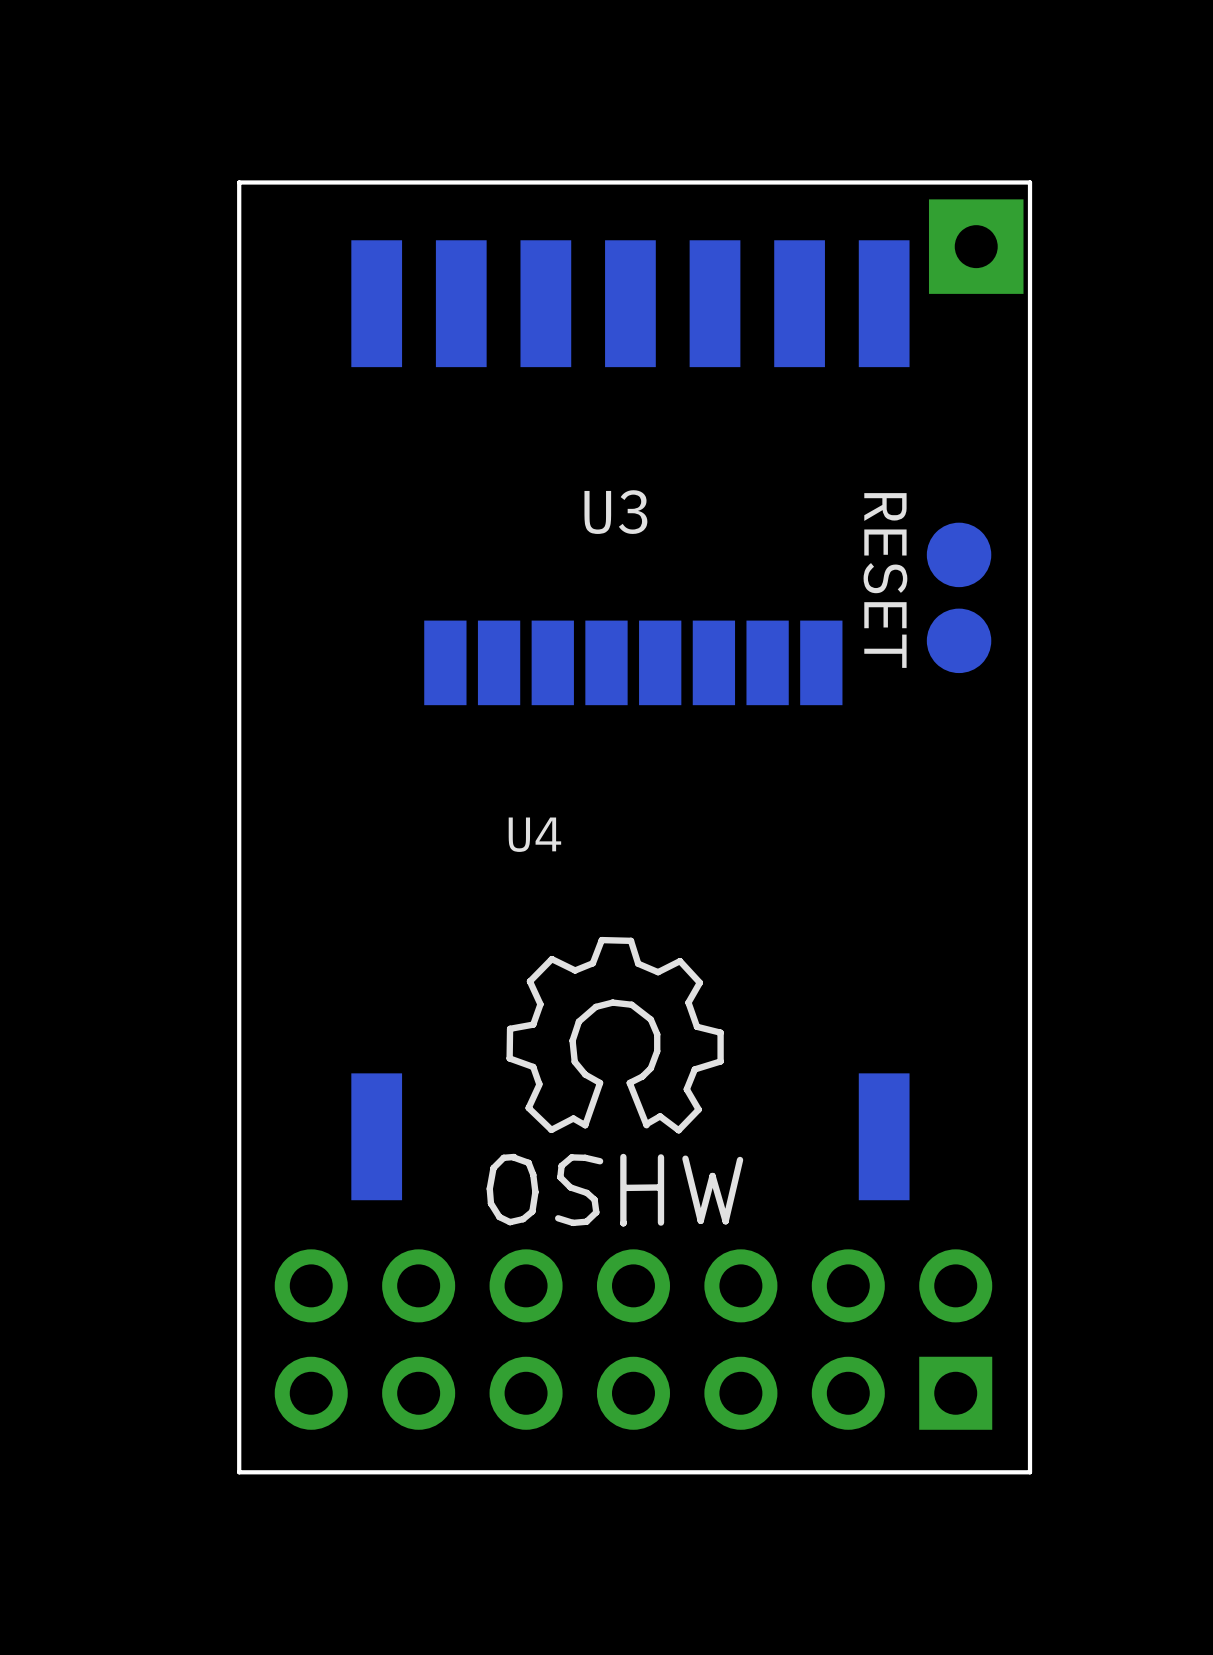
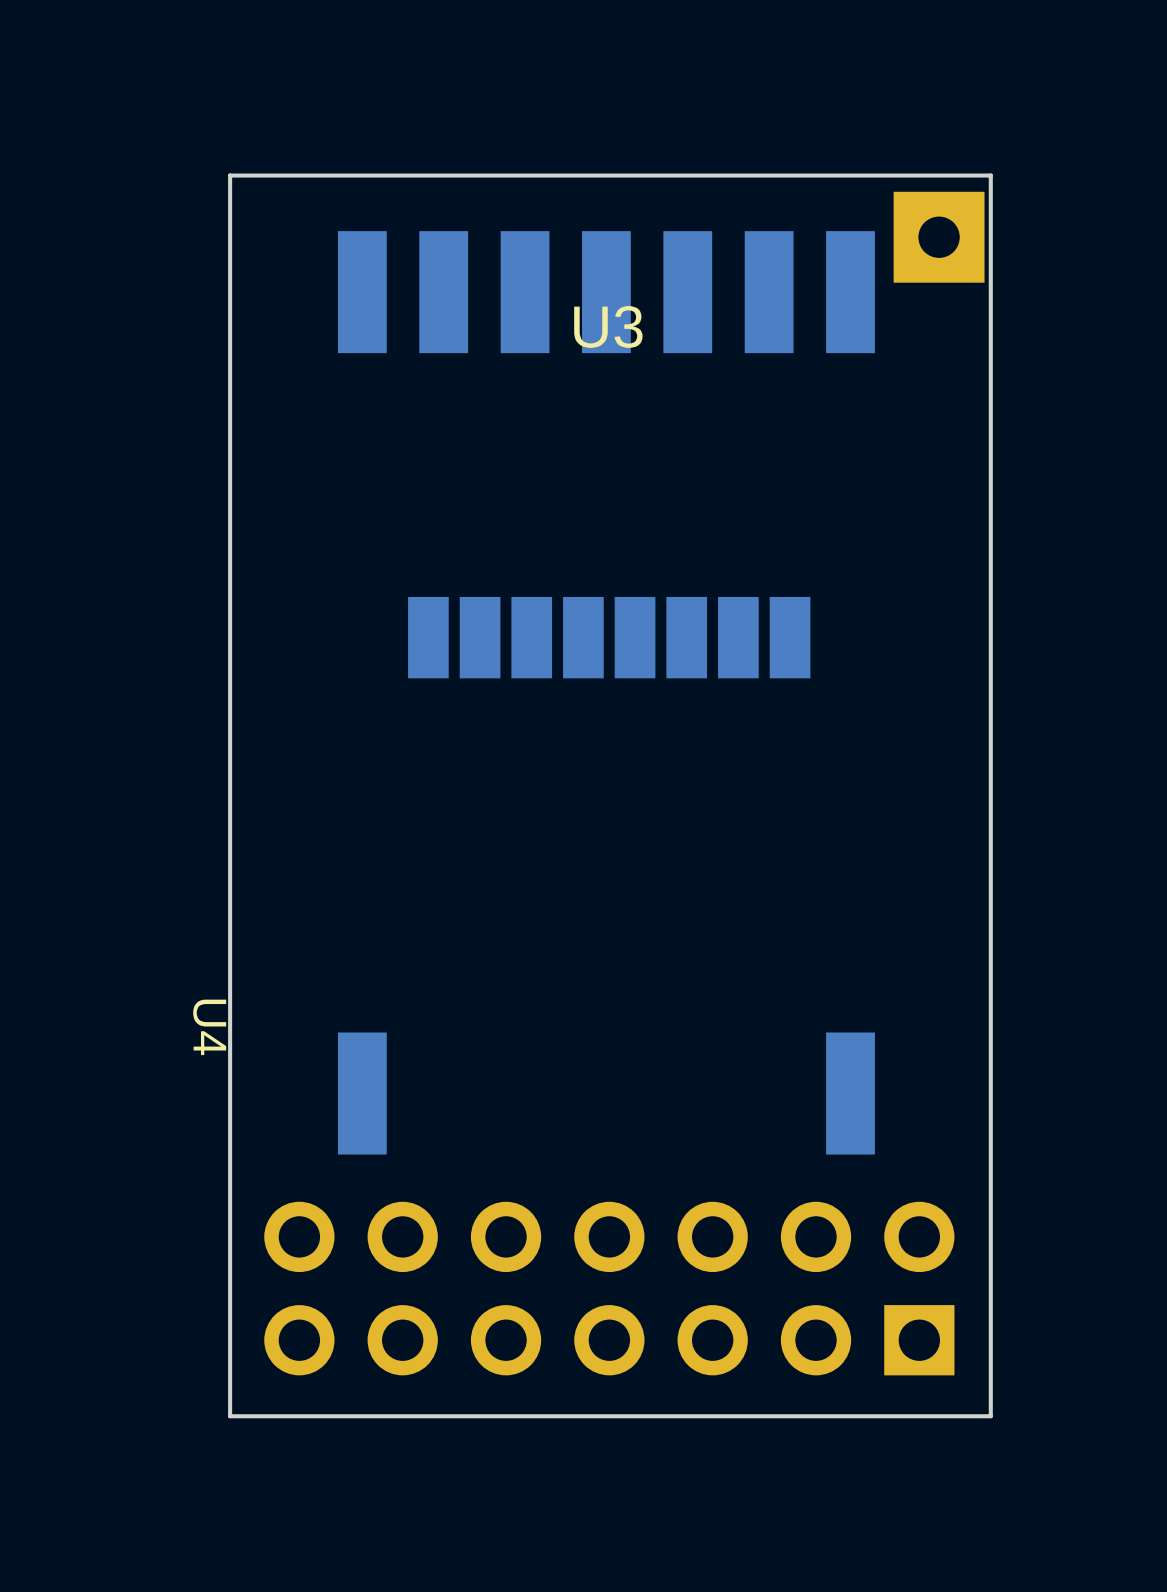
U3 name position: U3 (615, 512) -> U3 (608, 326)
part: RESET (959, 554) -> none
part: (959, 640) -> none
U4 name rotation: 0° (534, 834) -> 90° clockwise (209, 1027)
U4 name position: U4 (534, 834) -> U4 (209, 1027)
drawing: [486, 936, 744, 1227] -> none

